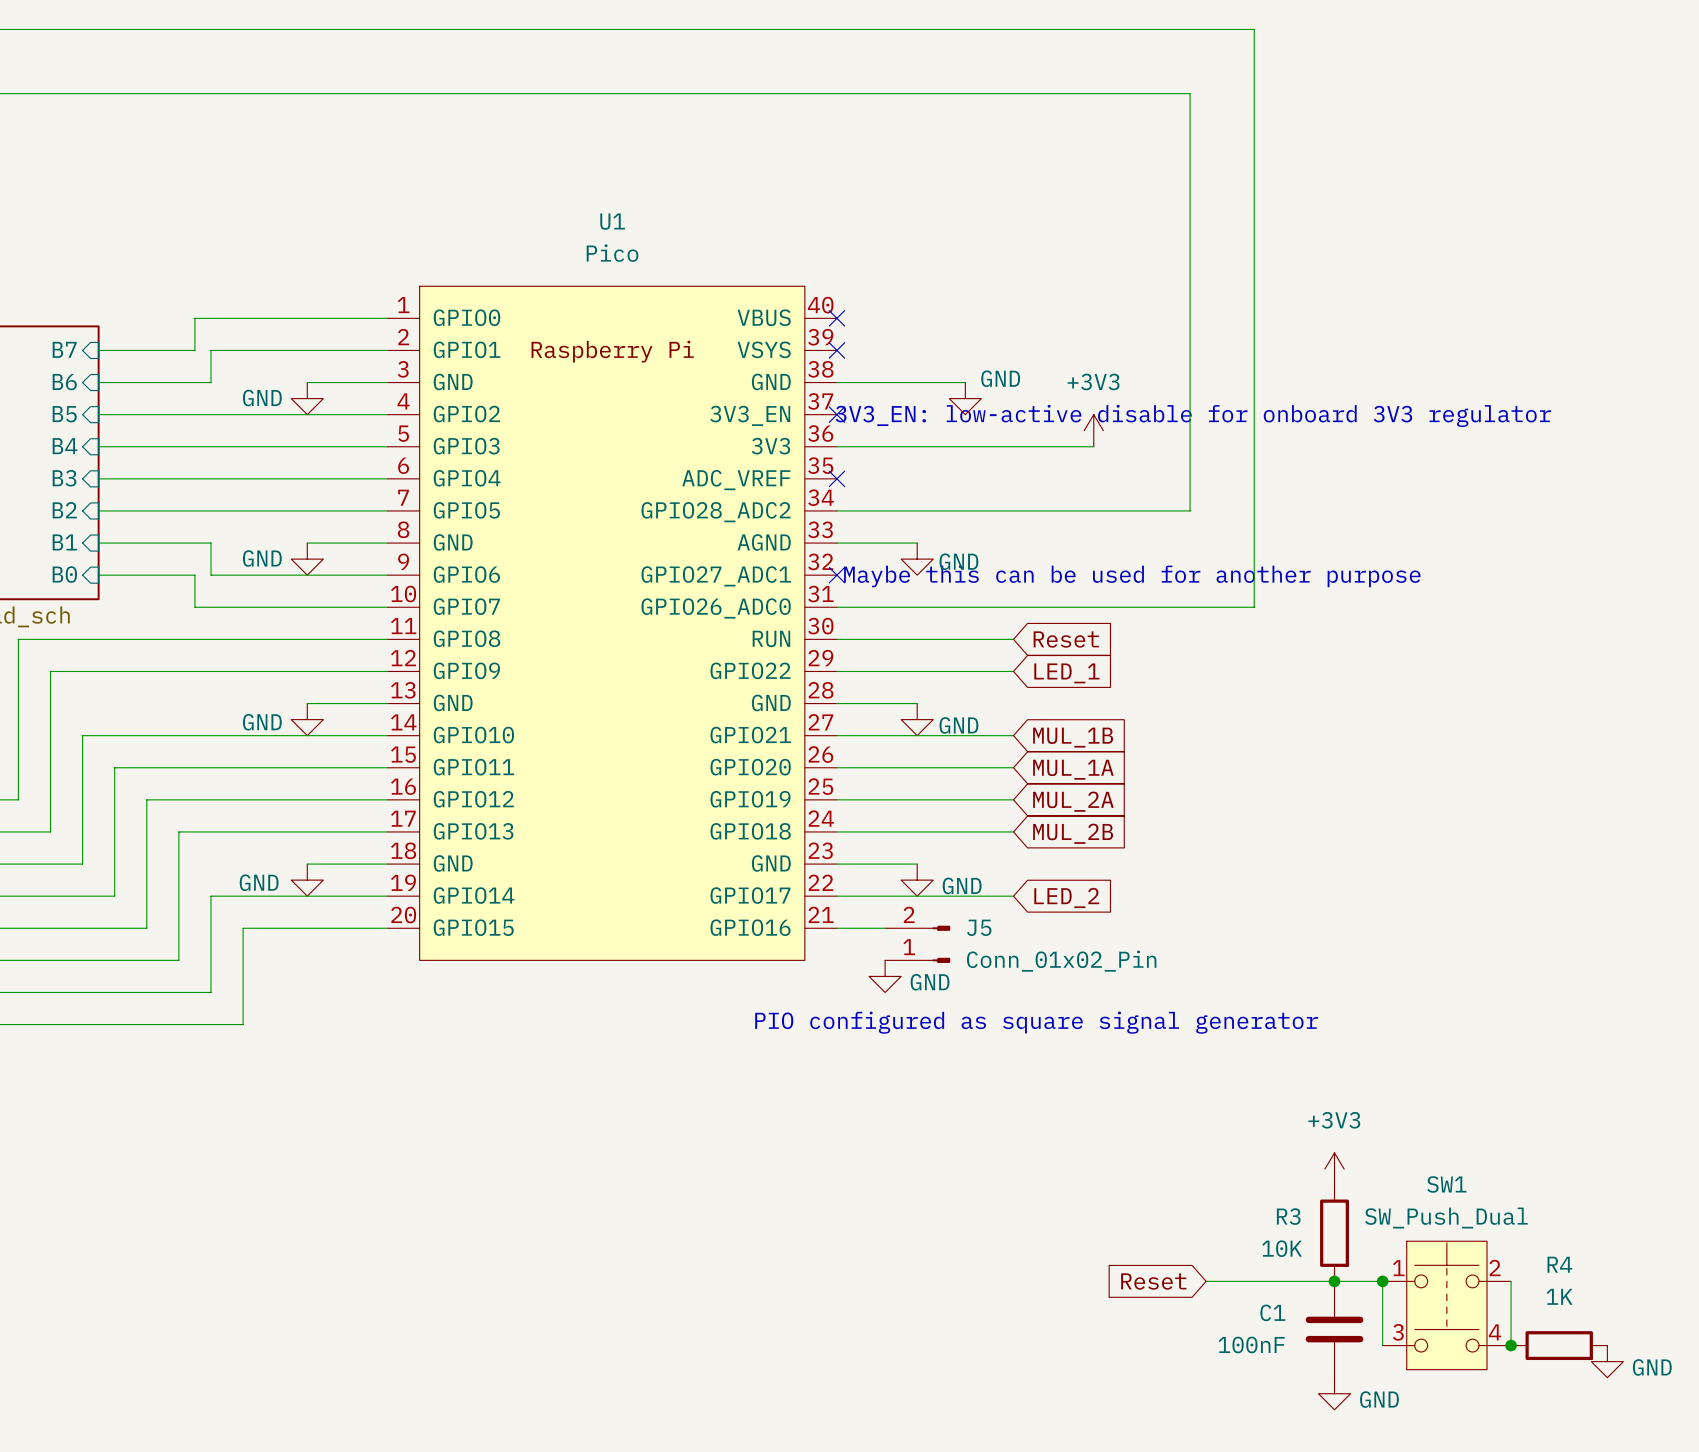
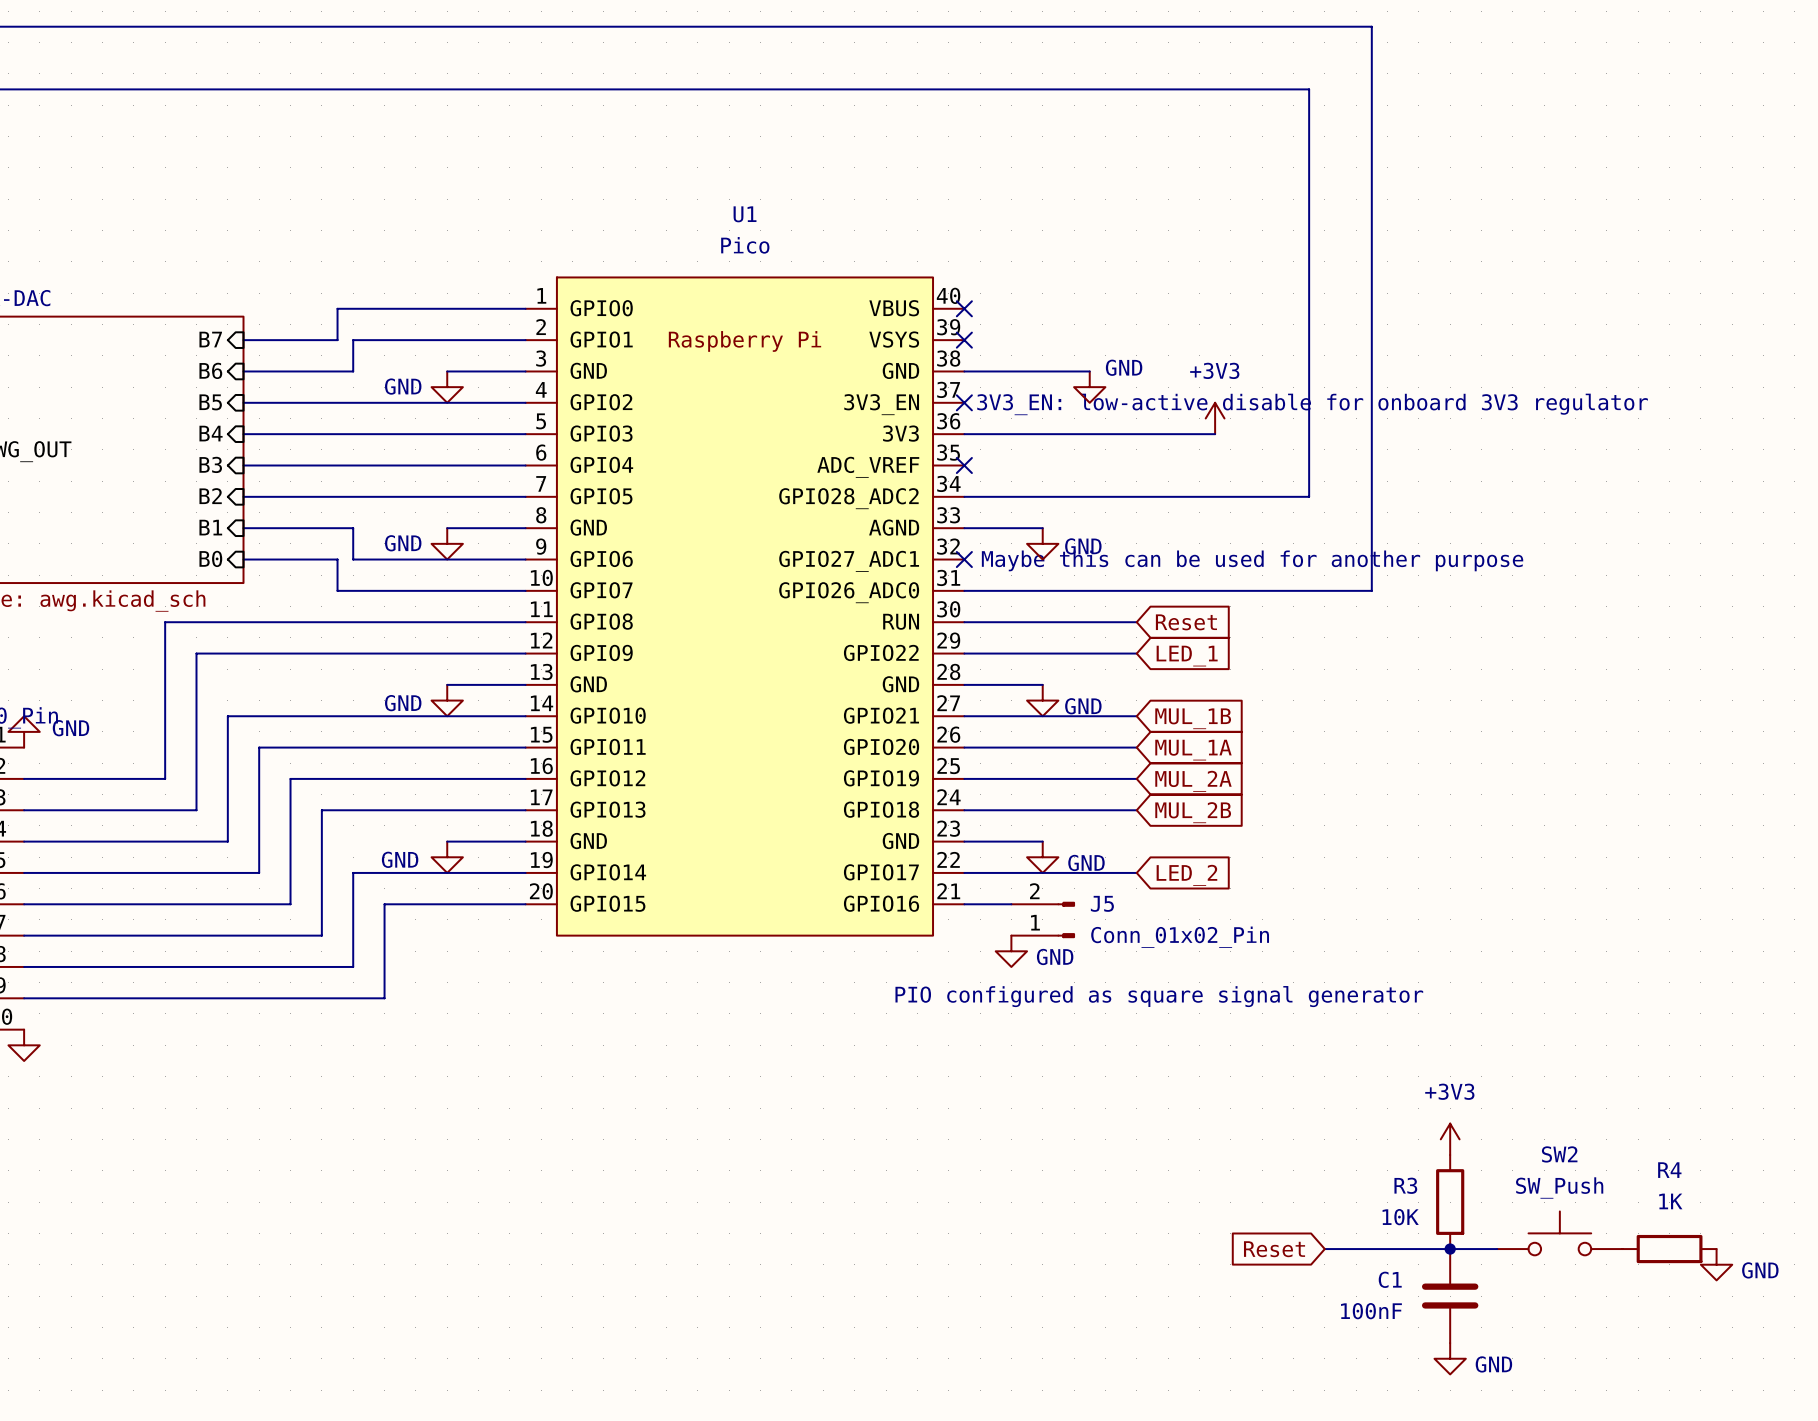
SW2: none -> SW_Push (1559, 1233)
wire: (1382, 1281) (1382, 1345) -> none
junction: (1382, 1281) -> none
wire: (1511, 1281) (1511, 1345) -> none
SW1: SW_Push_Dual (1446, 1305) -> none
junction: (1511, 1345) -> none
R4 position: (1559, 1345) -> (1669, 1249)
power symbol position: GND (1607, 1361) -> GND (1716, 1264)

